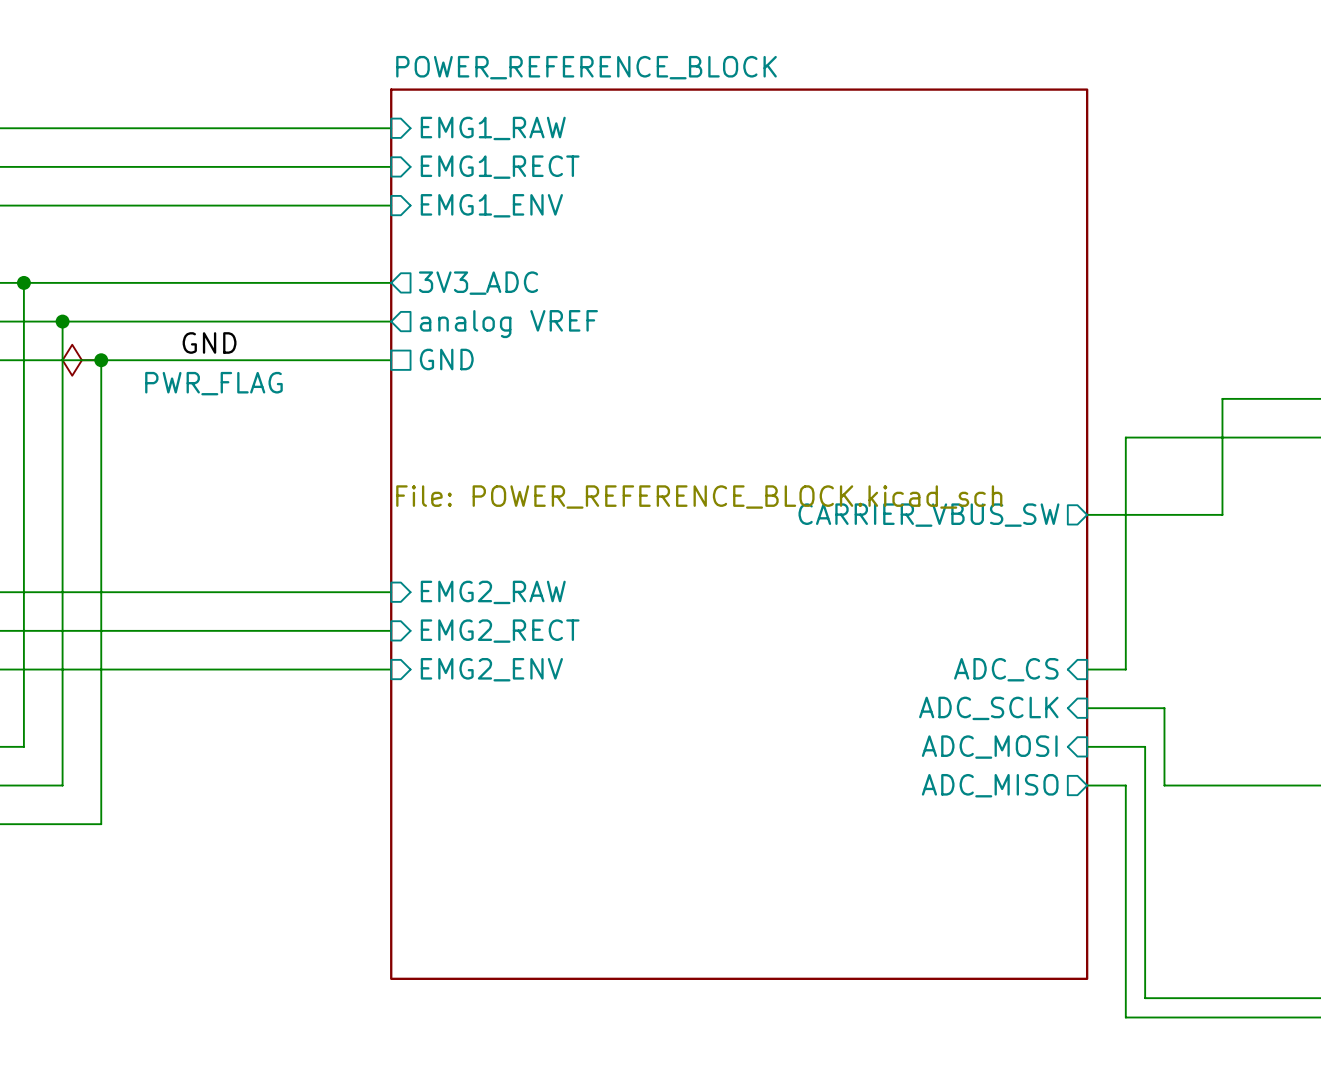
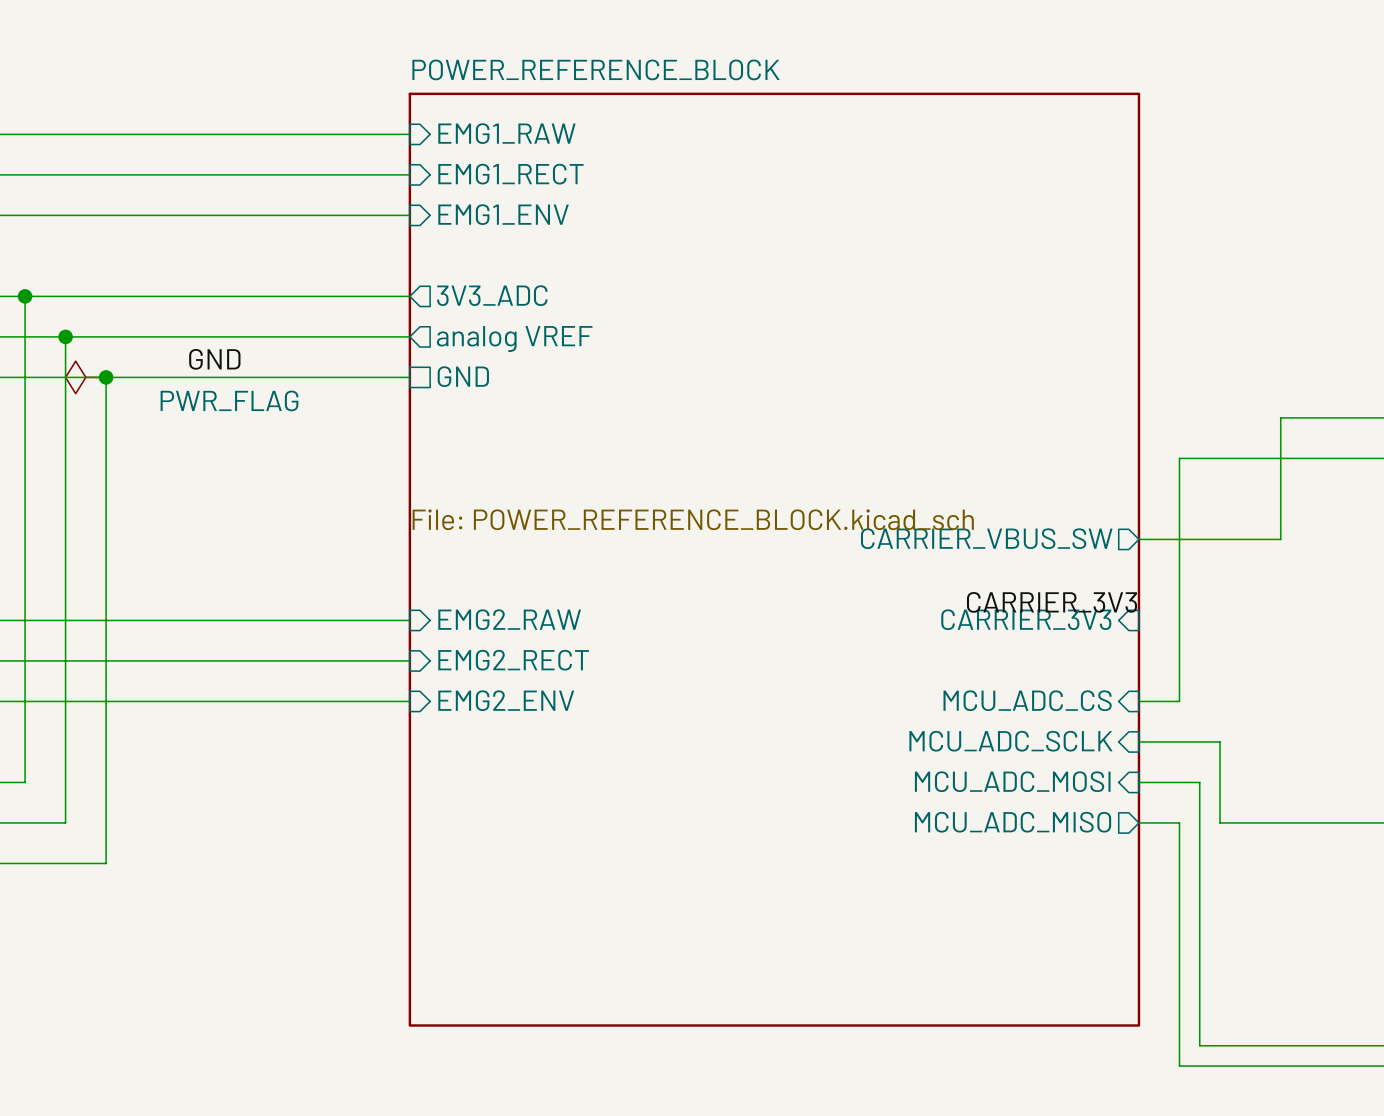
label: none -> CARRIER_3V3 (1052, 602)
sheet pin: none -> CARRIER_3V3 (1026, 619)
sheet pin: ADC_CS (1006, 669) -> MCU_ADC_CS (1027, 700)
sheet pin: ADC_SCLK (988, 708) -> MCU_ADC_SCLK (1010, 741)
sheet pin: ADC_MOSI (989, 747) -> MCU_ADC_MOSI (1012, 781)
sheet pin: ADC_MISO (990, 785) -> MCU_ADC_MISO (1013, 822)

